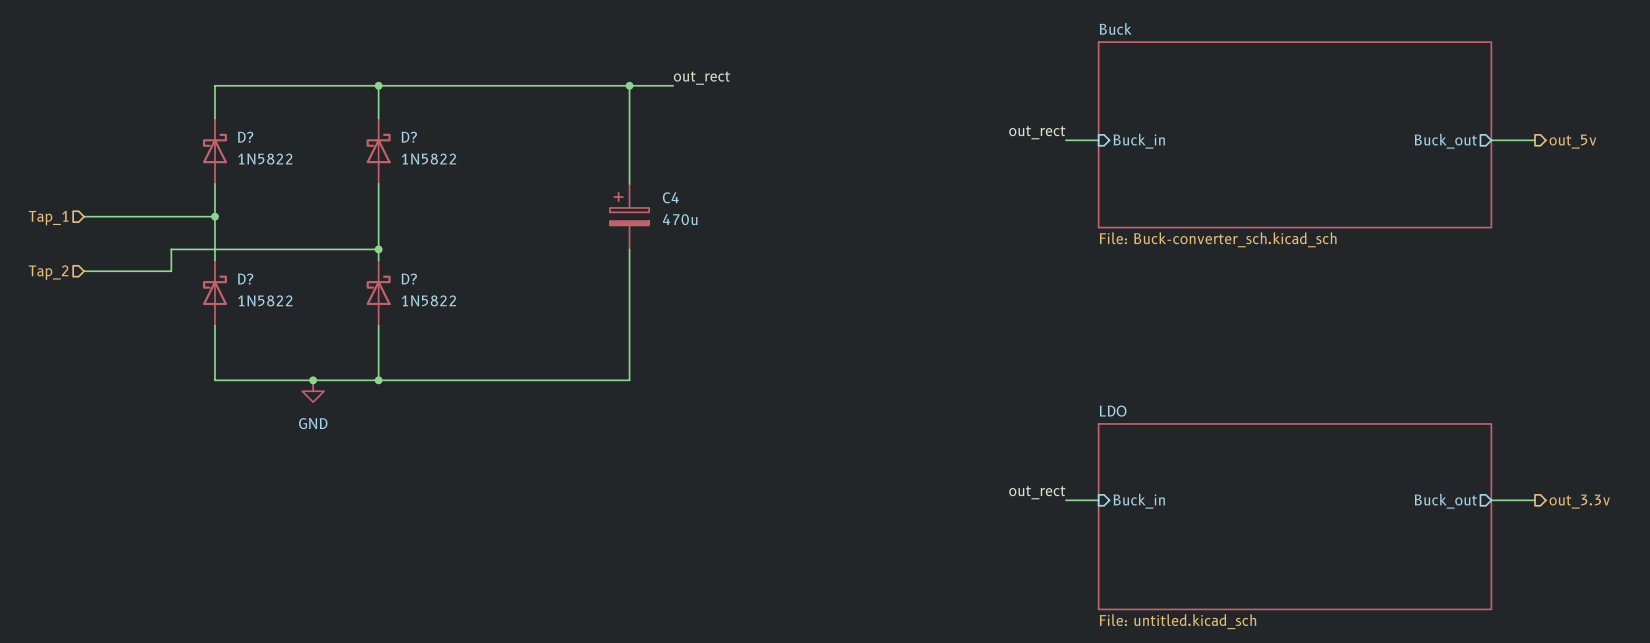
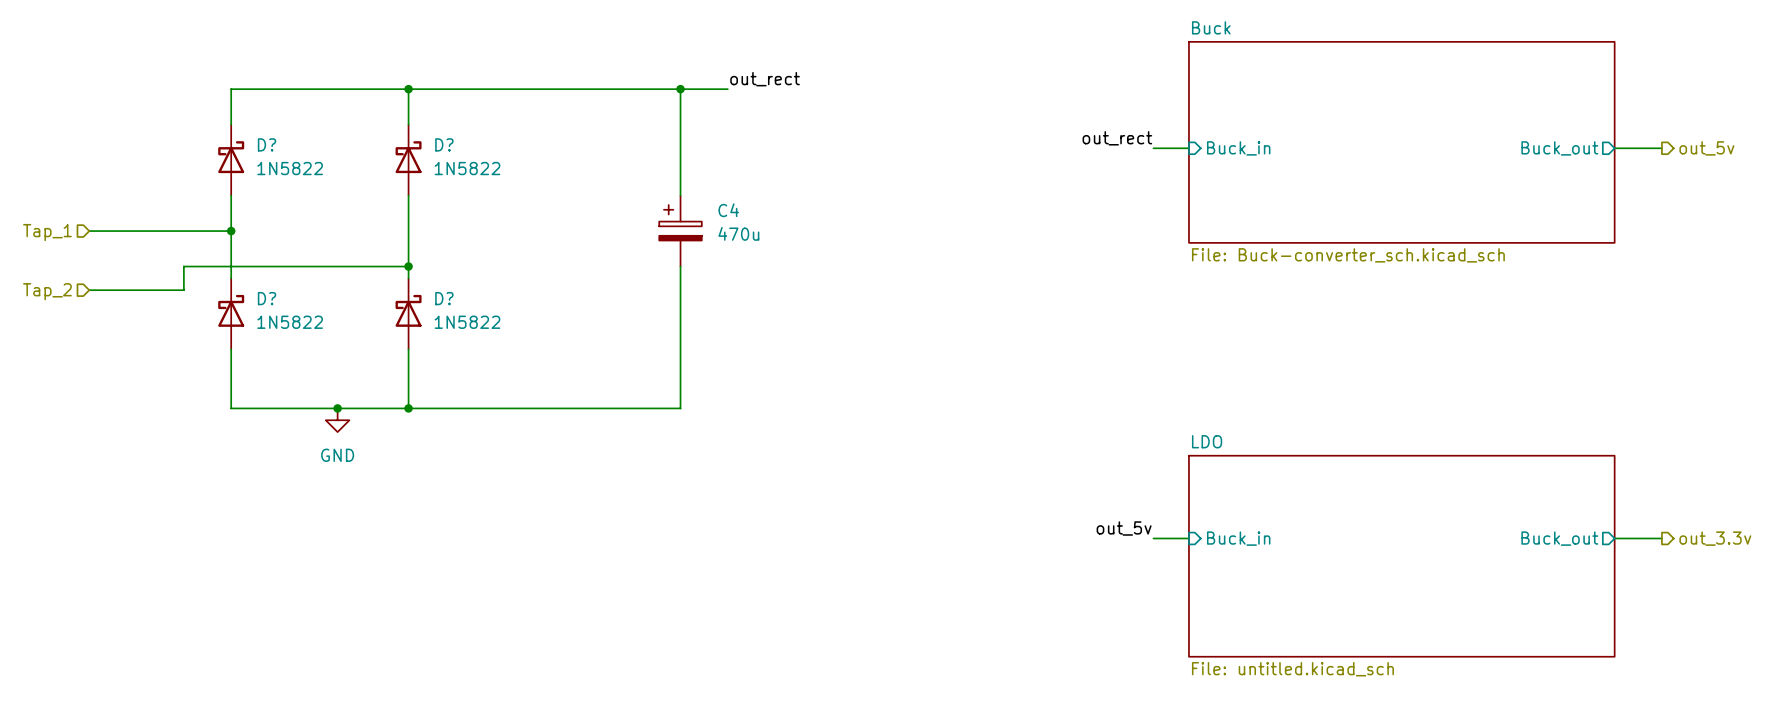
label: out_rect (1037, 492) -> out_5v (1124, 528)

